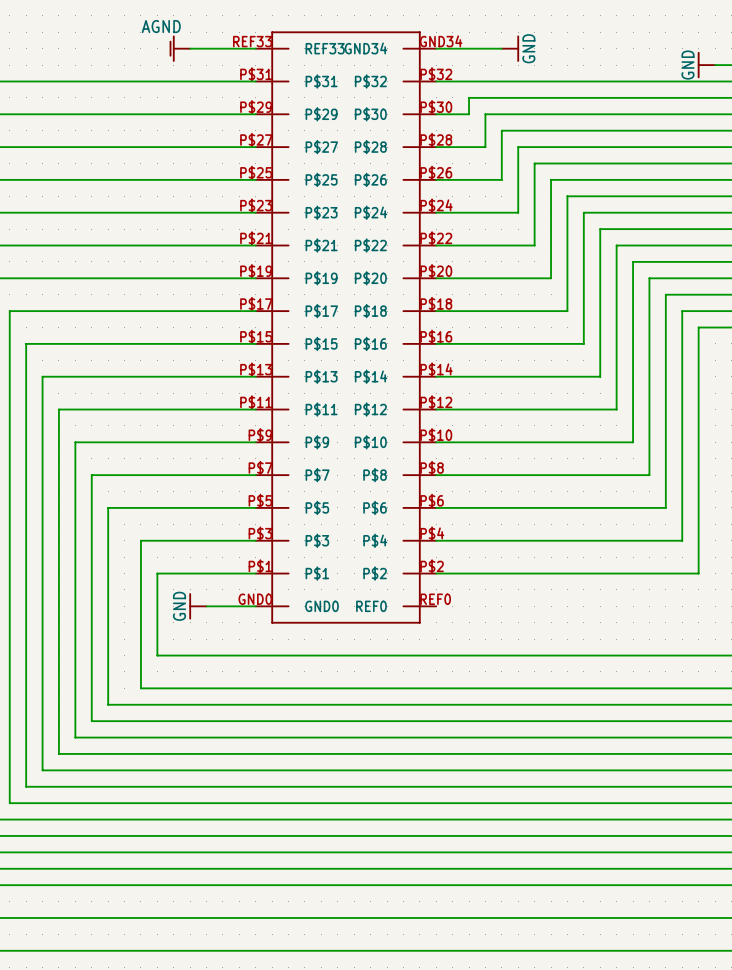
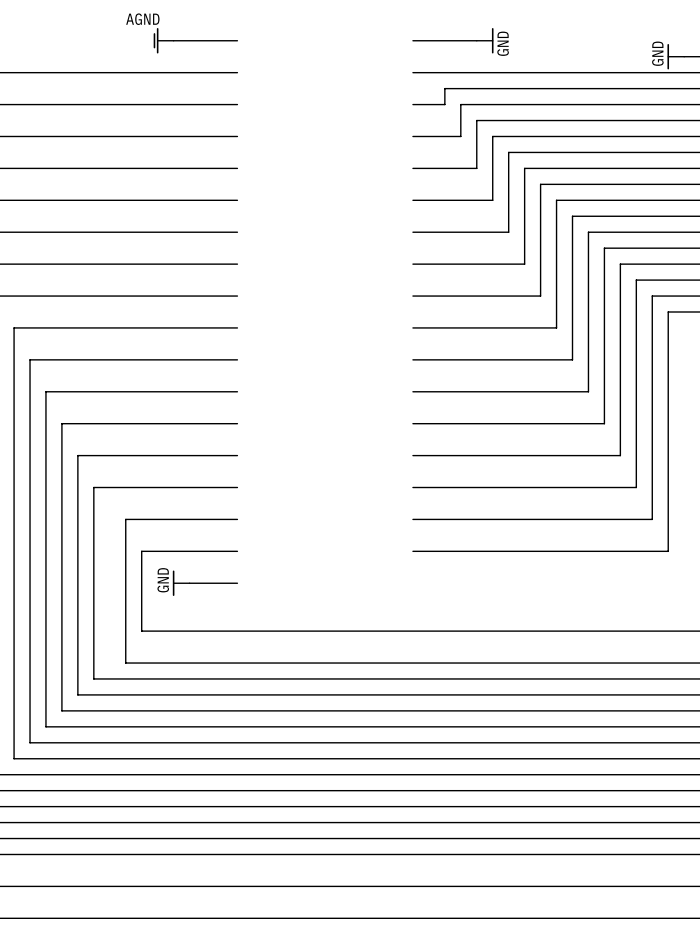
part: (346, 327) -> none

